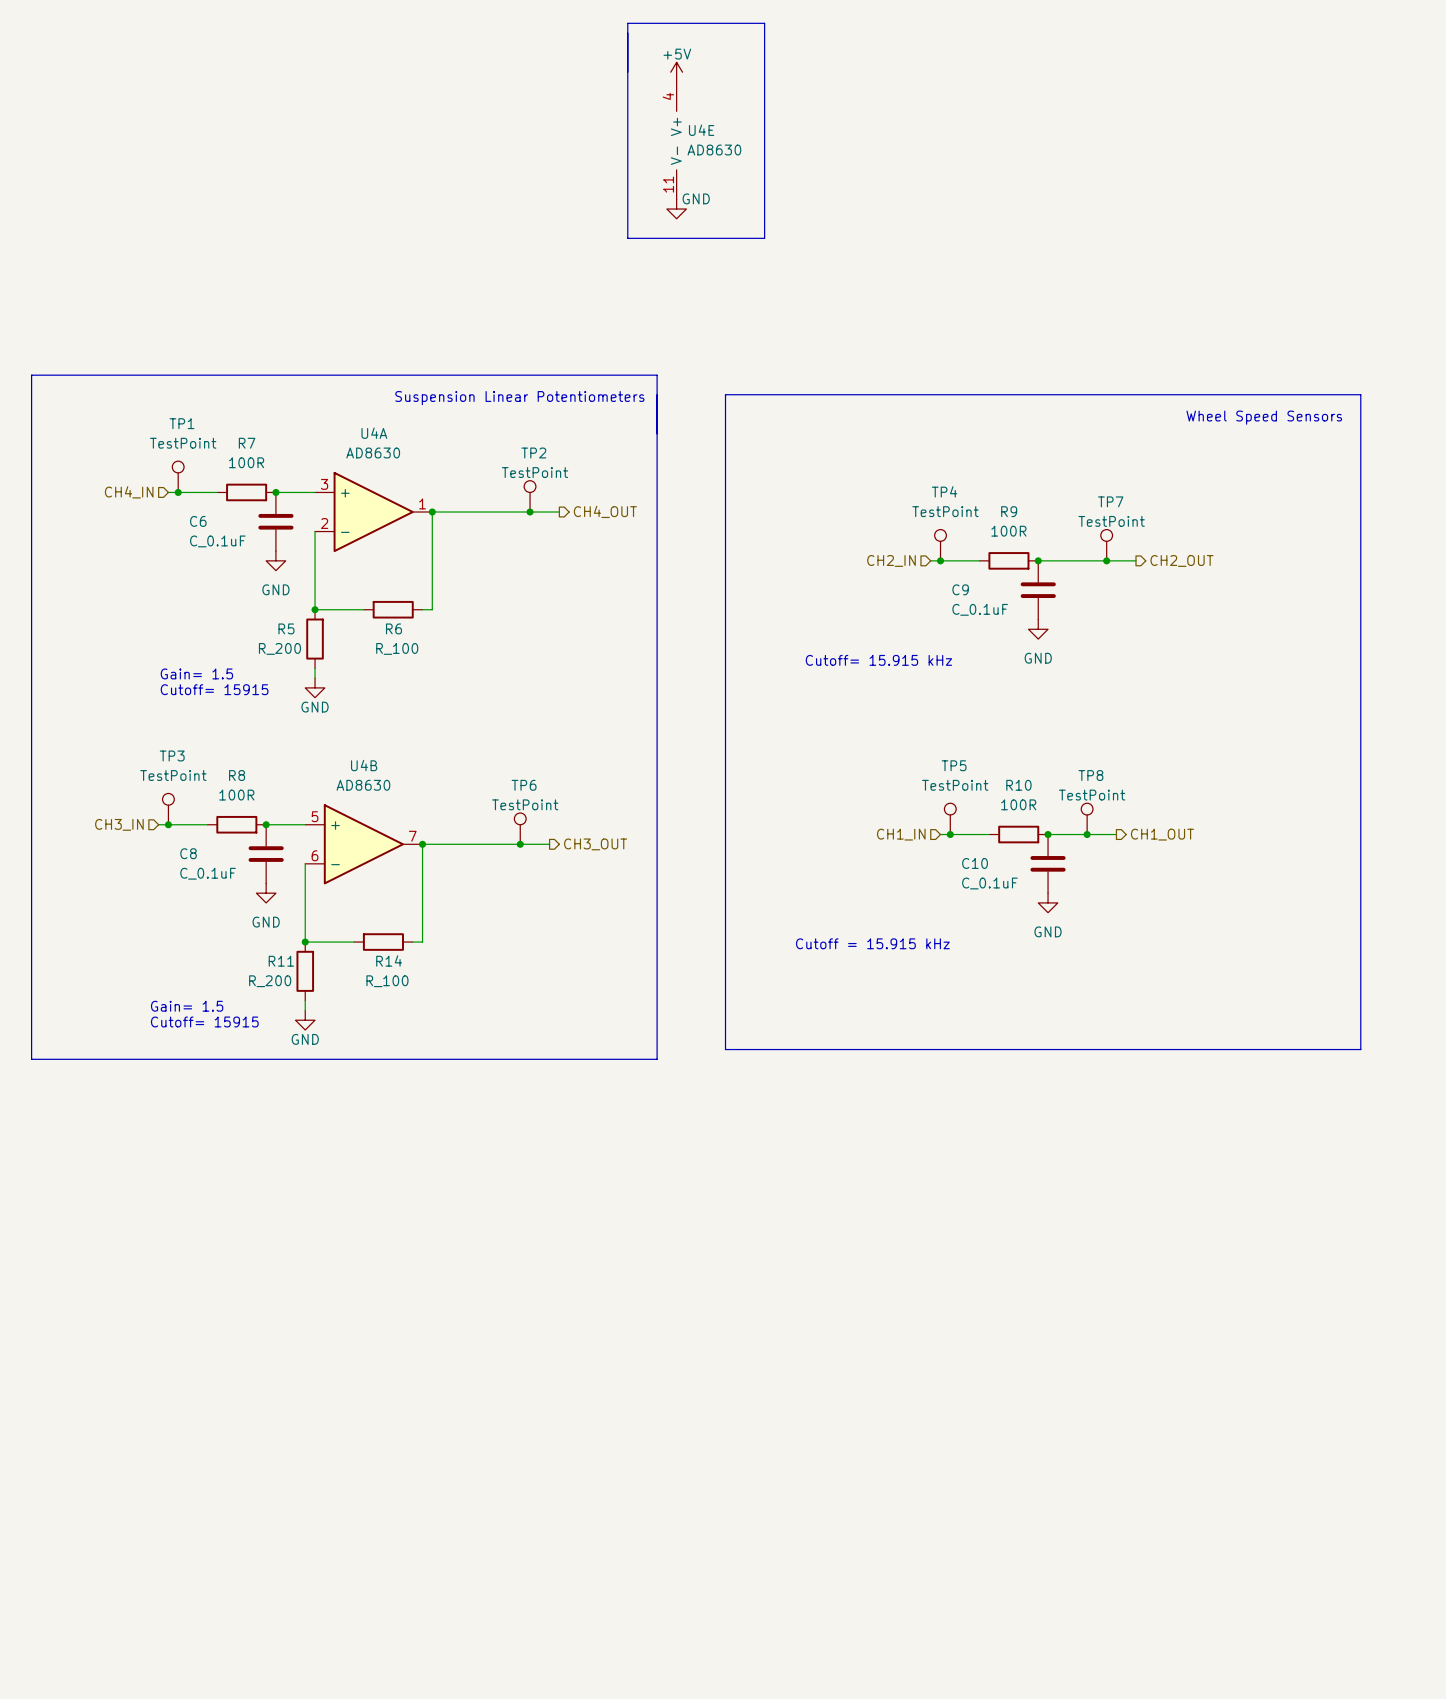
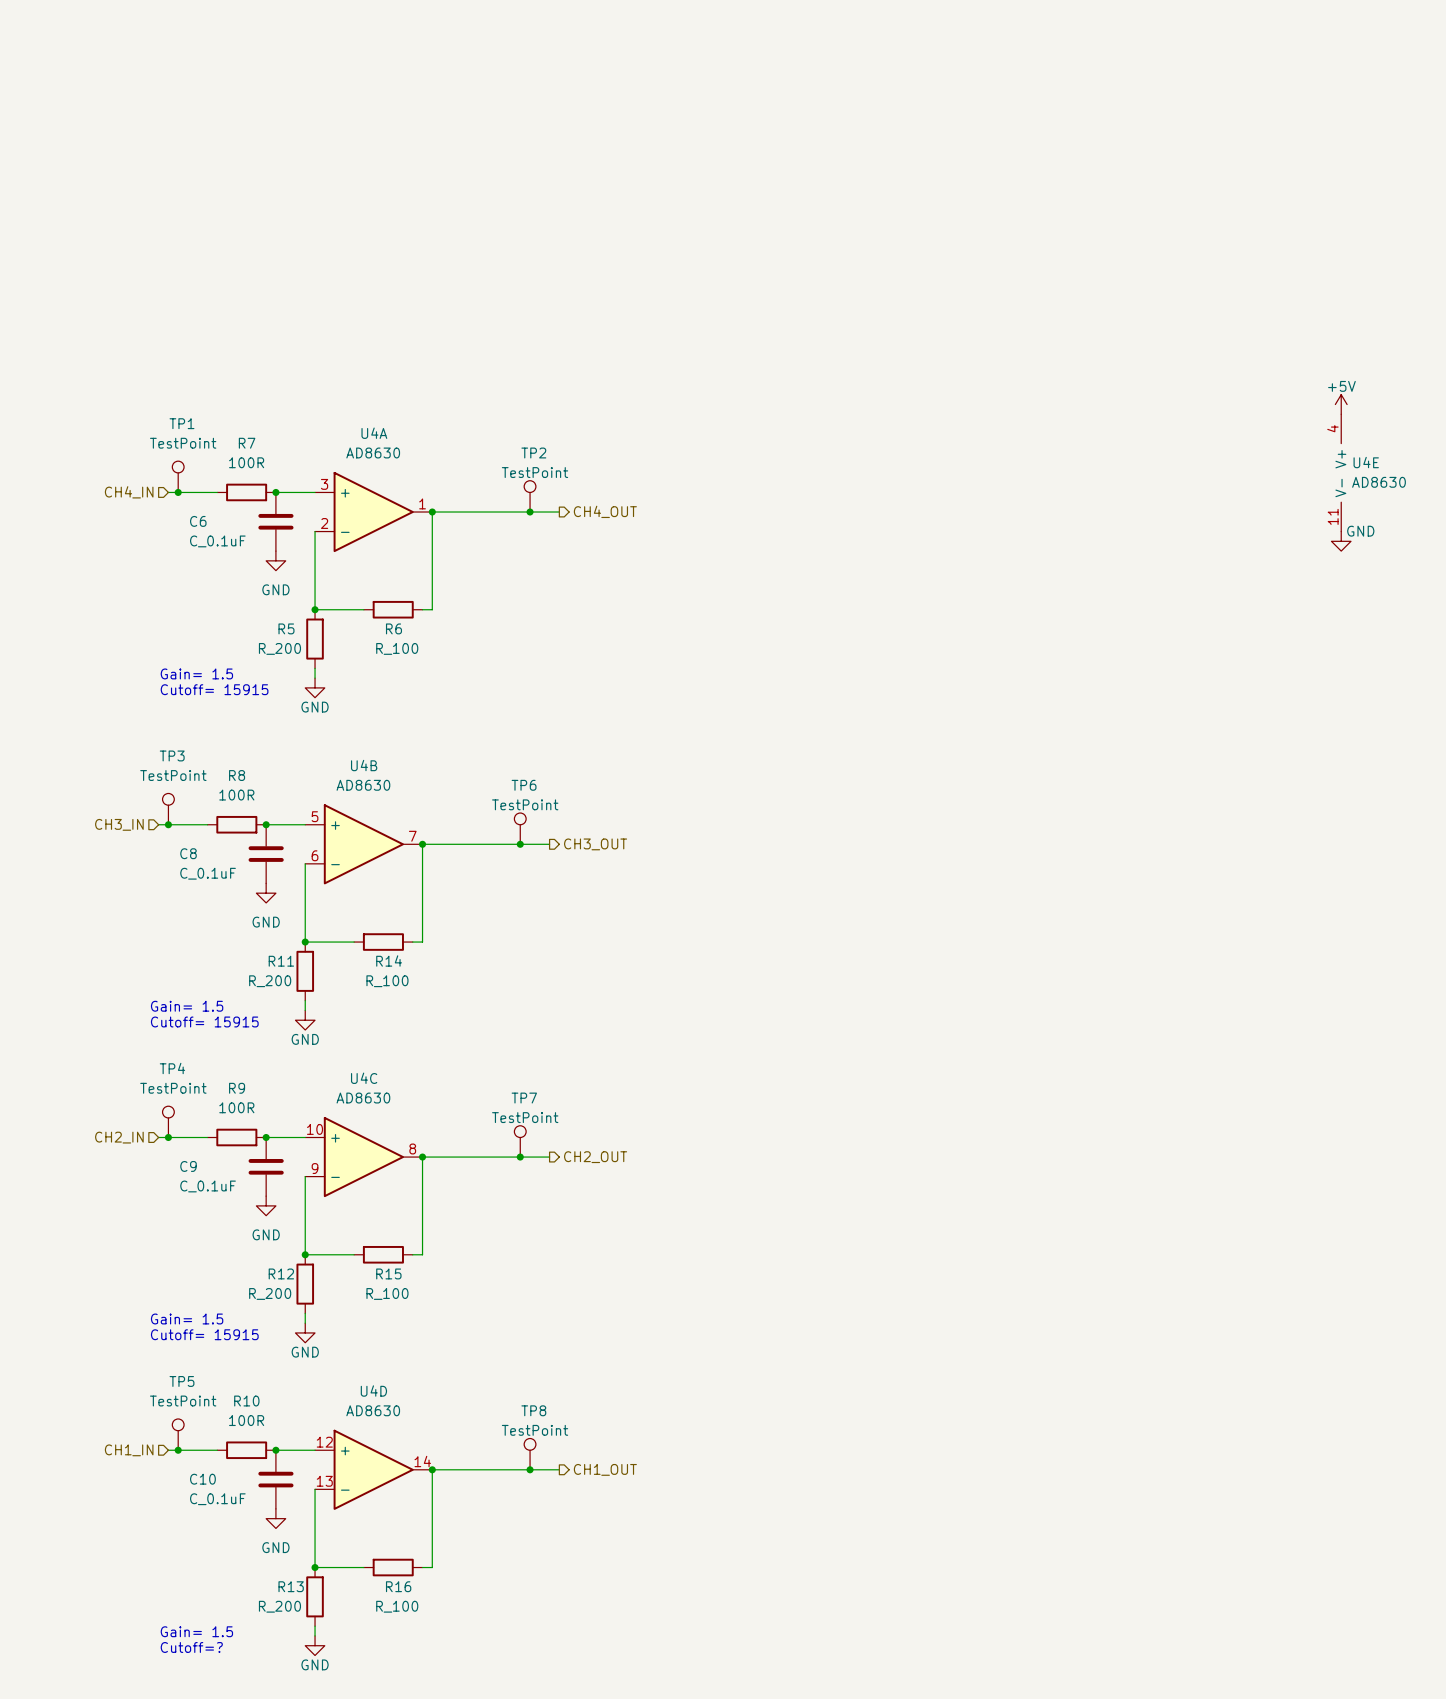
line: (627, 23) (764, 23) (764, 238) (627, 238) (627, 23) -> none
power symbol: +5V (676, 72) -> none
U4E position: (676, 140) -> (1341, 472)
power symbol: GND (676, 209) -> none
line: (31, 375) (657, 375) (657, 1059) (31, 1059) (31, 375) -> none
line: (725, 394) (725, 1049) (1360, 1049) (1360, 394) (725, 394) -> none
text: Suspension Linear Potentiometers (519, 398) -> none
power symbol: none -> +5V (1341, 404)
text: Wheel Speed Sensors (1264, 417) -> none
power symbol: none -> GND (1341, 541)
TP4 position: (940, 545) -> (168, 1121)
TP7 position: (1106, 545) -> (520, 1141)
hierarchical label: CH2_IN (891, 560) -> none
wire: (930, 560) (979, 560) -> none
junction: (940, 560) -> none
R9 position: (1008, 560) -> (236, 1137)
wire: (1038, 560) (1135, 560) -> none
junction: (1038, 560) -> none
junction: (1106, 560) -> none
hierarchical label: CH2_OUT (1181, 560) -> none
C9 position: (1038, 590) -> (266, 1166)
power symbol: GND (1038, 629) -> none
text: Cutoff= 15.915 kHz (878, 660) -> none
TP5 position: (950, 818) -> (178, 1434)
TP8 position: (1087, 818) -> (530, 1454)
hierarchical label: CH1_IN (901, 834) -> none
wire: (940, 834) (989, 834) -> none
junction: (950, 834) -> none
R10 position: (1018, 834) -> (246, 1450)
wire: (1048, 834) (1116, 834) -> none
junction: (1048, 834) -> none
junction: (1087, 834) -> none
hierarchical label: CH1_OUT (1162, 834) -> none
C10 position: (1048, 863) -> (275, 1479)
power symbol: GND (1048, 902) -> none
text: Cutoff = 15.915 kHz (872, 943) -> none
hierarchical label: none -> CH2_IN (119, 1137)
wire: none -> (158, 1137) (207, 1137)
junction: none -> (168, 1137)
wire: none -> (266, 1137) (305, 1137)
junction: none -> (266, 1137)
U4C: none -> AD8630 (363, 1157)
junction: none -> (422, 1157)
junction: none -> (520, 1157)
wire: none -> (549, 1157) (422, 1157) (422, 1254) (412, 1254)
hierarchical label: none -> CH2_OUT (595, 1157)
wire: none -> (305, 1176) (305, 1254) (354, 1254)
power symbol: none -> GND (266, 1205)
junction: none -> (305, 1254)
R15: none -> R_100 (383, 1254)
R12: none -> R_200 (305, 1284)
wire: none -> (305, 1313) (305, 1323)
text: none -> Gain= 1.5 (187, 1319)
power symbol: none -> GND (305, 1332)
text: none -> Cutoff= 15915 (204, 1334)
hierarchical label: none -> CH1_IN (129, 1450)
wire: none -> (168, 1450) (217, 1450)
junction: none -> (178, 1450)
wire: none -> (275, 1450) (315, 1450)
junction: none -> (275, 1450)
U4D: none -> AD8630 (373, 1469)
junction: none -> (432, 1469)
junction: none -> (530, 1469)
wire: none -> (559, 1469) (432, 1469) (432, 1567) (422, 1567)
hierarchical label: none -> CH1_OUT (605, 1469)
wire: none -> (315, 1489) (315, 1567) (363, 1567)
power symbol: none -> GND (275, 1518)
junction: none -> (315, 1567)
R16: none -> R_100 (393, 1567)
R13: none -> R_200 (315, 1596)
wire: none -> (315, 1626) (315, 1635)
text: none -> Gain= 1.5 (196, 1631)
power symbol: none -> GND (315, 1645)
text: none -> Cutoff=? (191, 1647)

